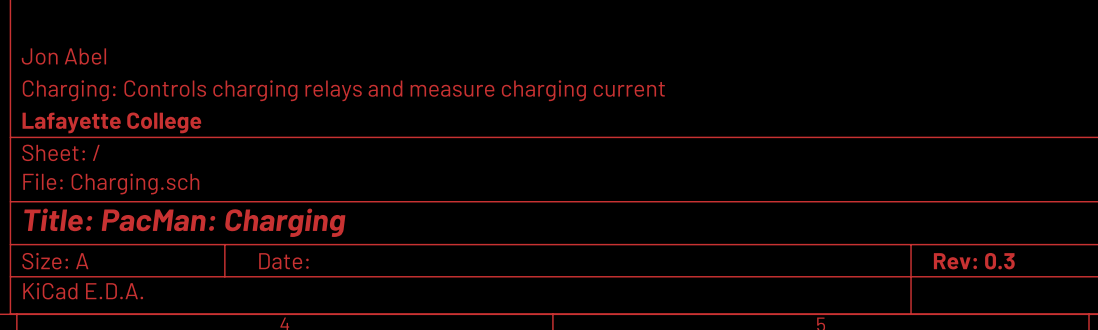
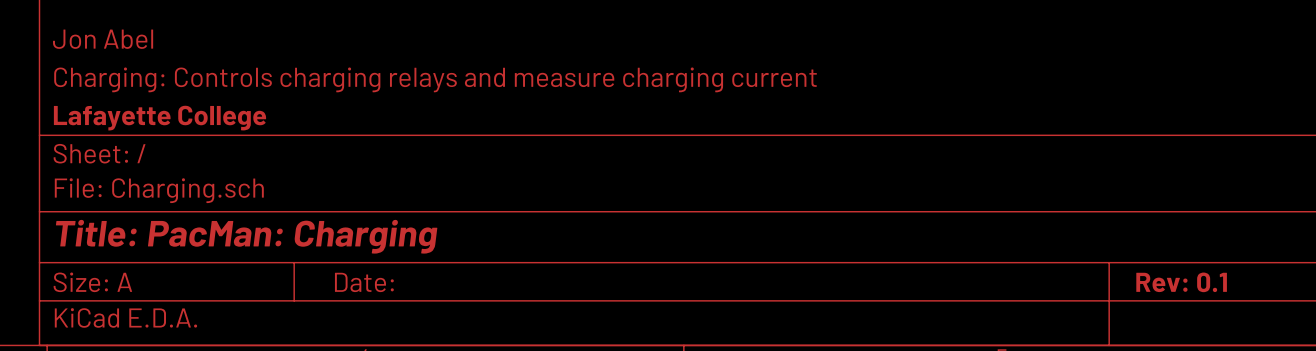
title block: Rev: 0.3 (974, 261) -> Rev: 0.1 (1181, 282)

